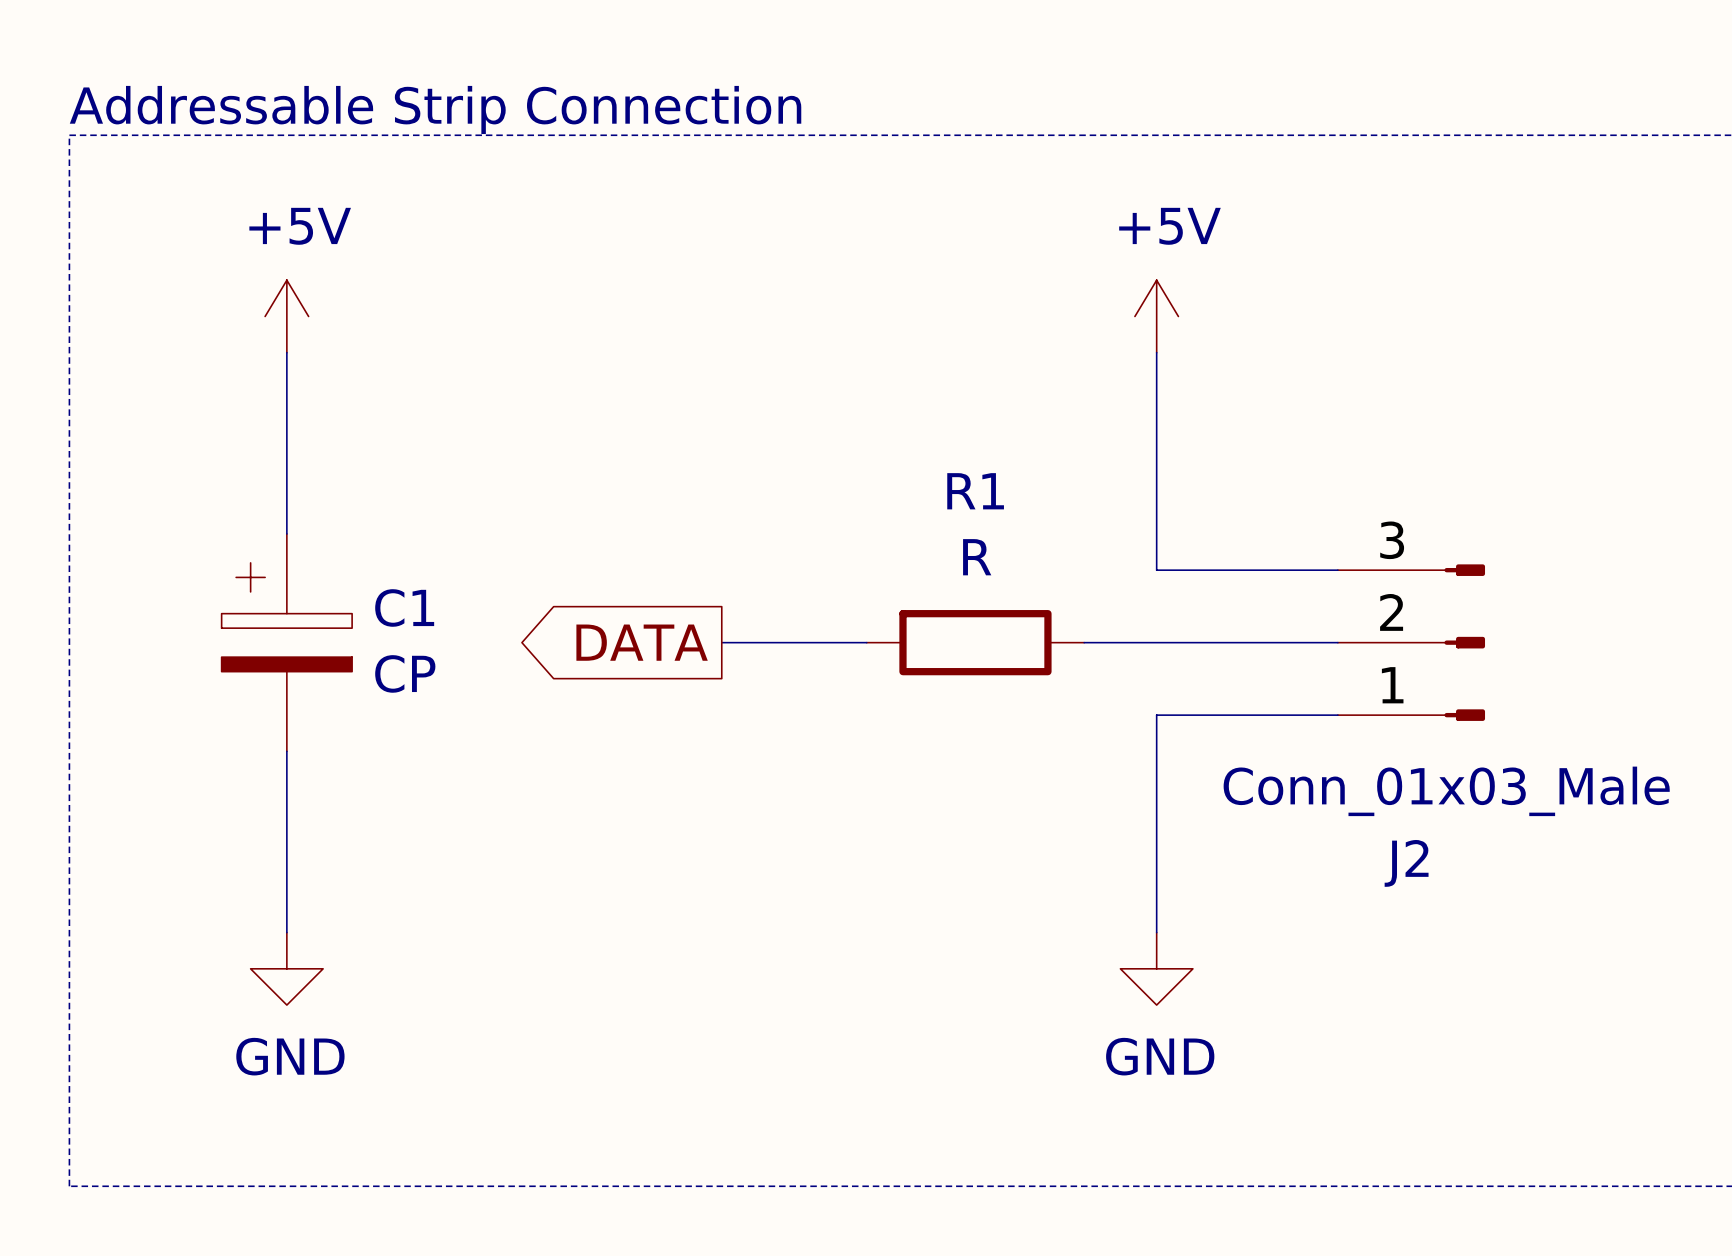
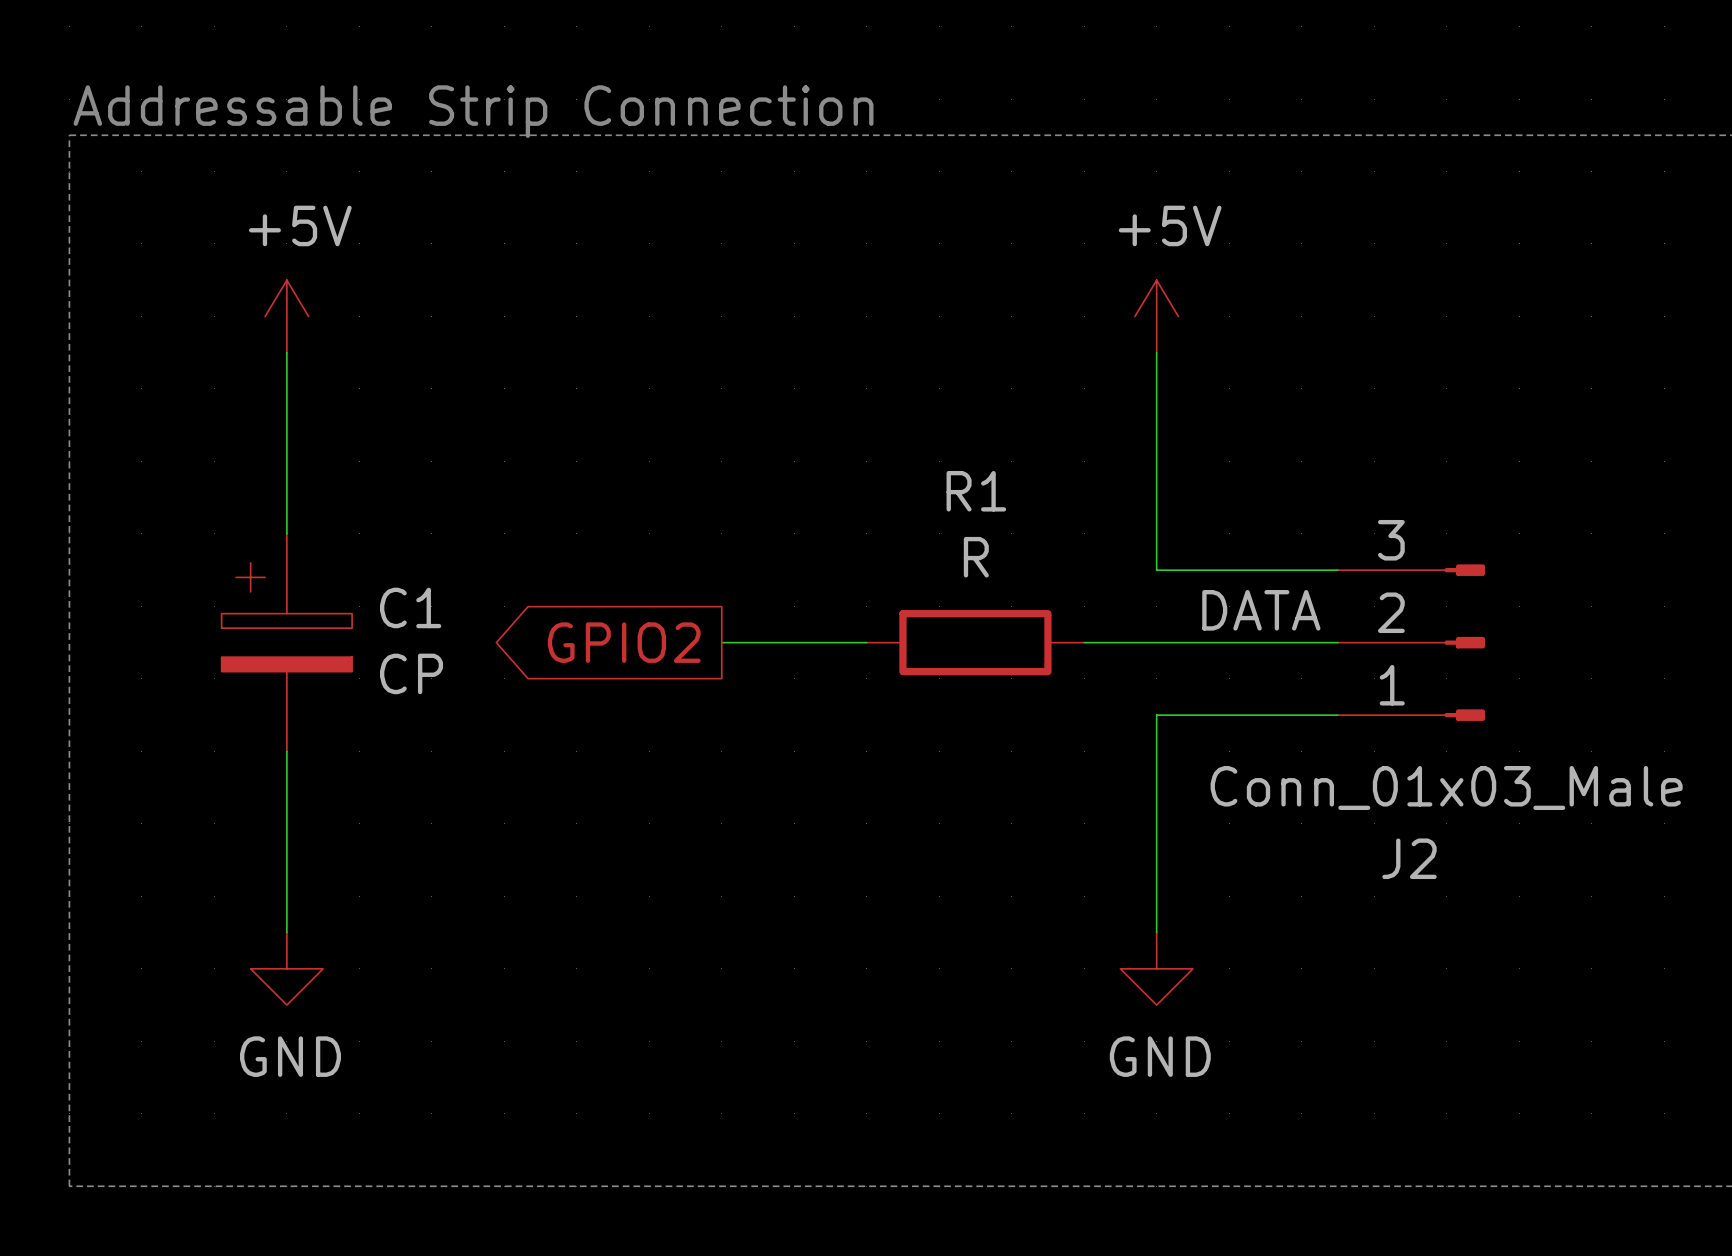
label: none -> DATA (1261, 610)
global label: DATA (642, 642) -> GPIO2 (624, 642)

